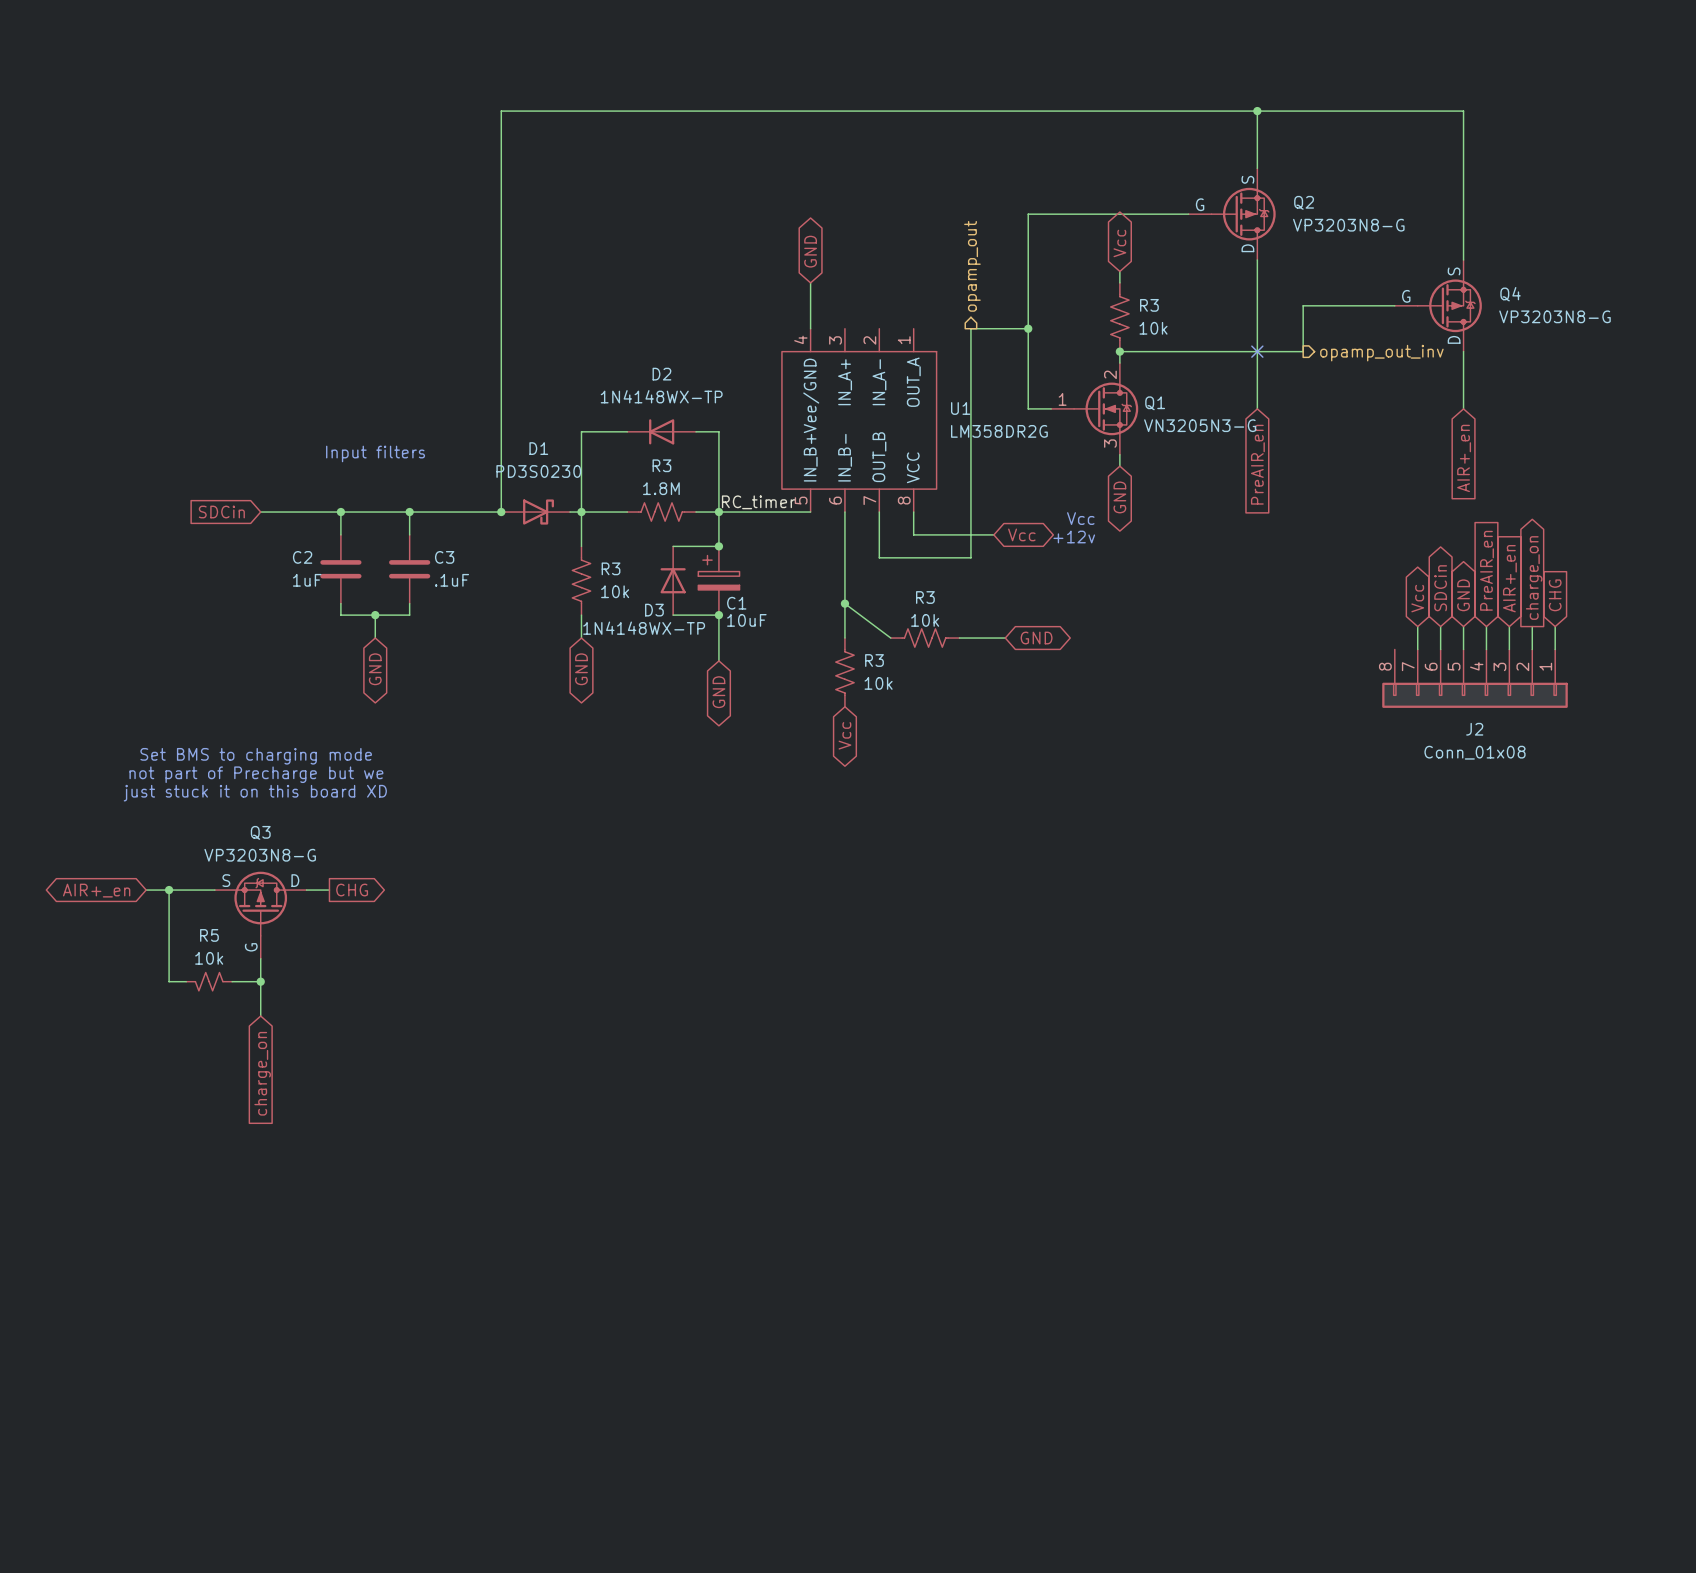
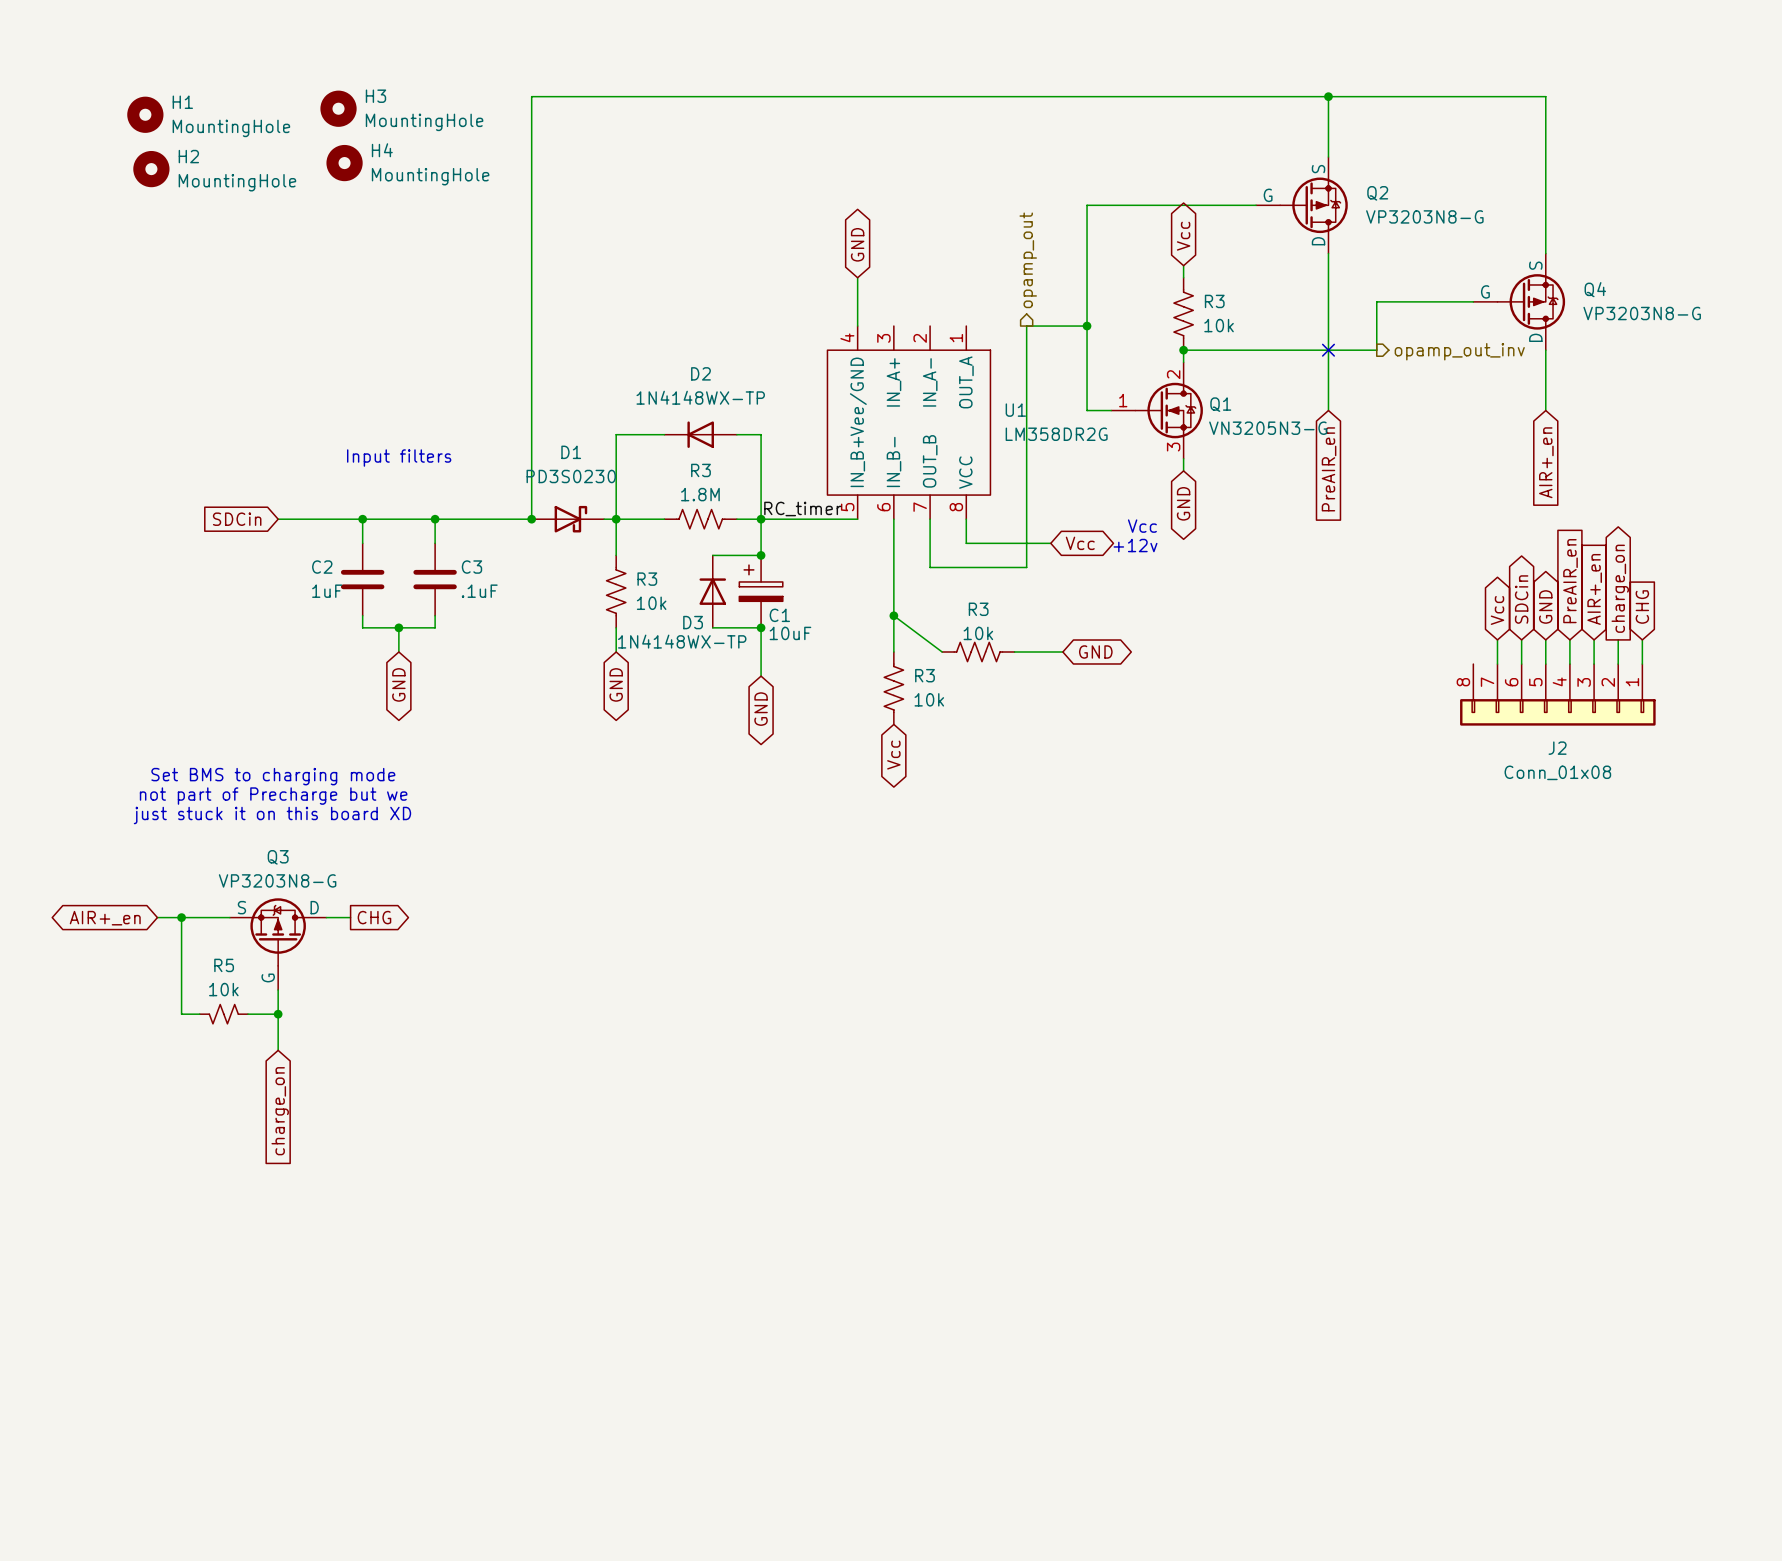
H3: none -> MountingHole (338, 108)
H1: none -> MountingHole (145, 114)
H4: none -> MountingHole (344, 163)
H2: none -> MountingHole (151, 169)

